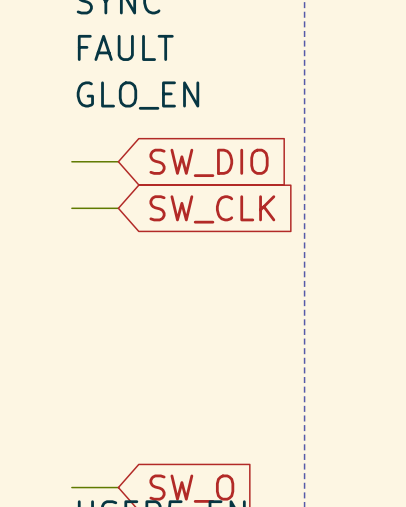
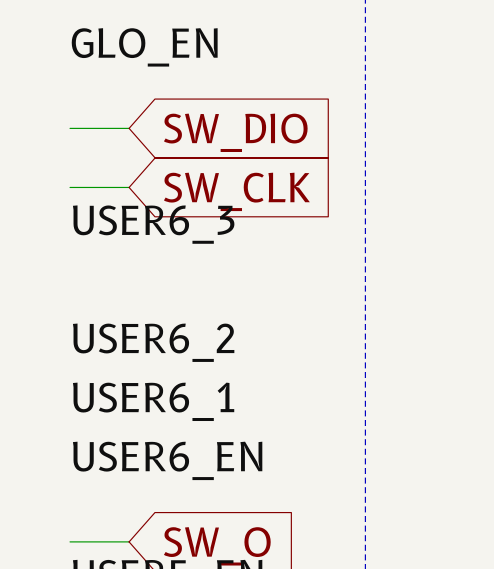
label: none -> USER6_3 (153, 224)
label: none -> USER6_2 (153, 342)
label: none -> USER6_1 (153, 401)
label: none -> USER6_EN (167, 460)

